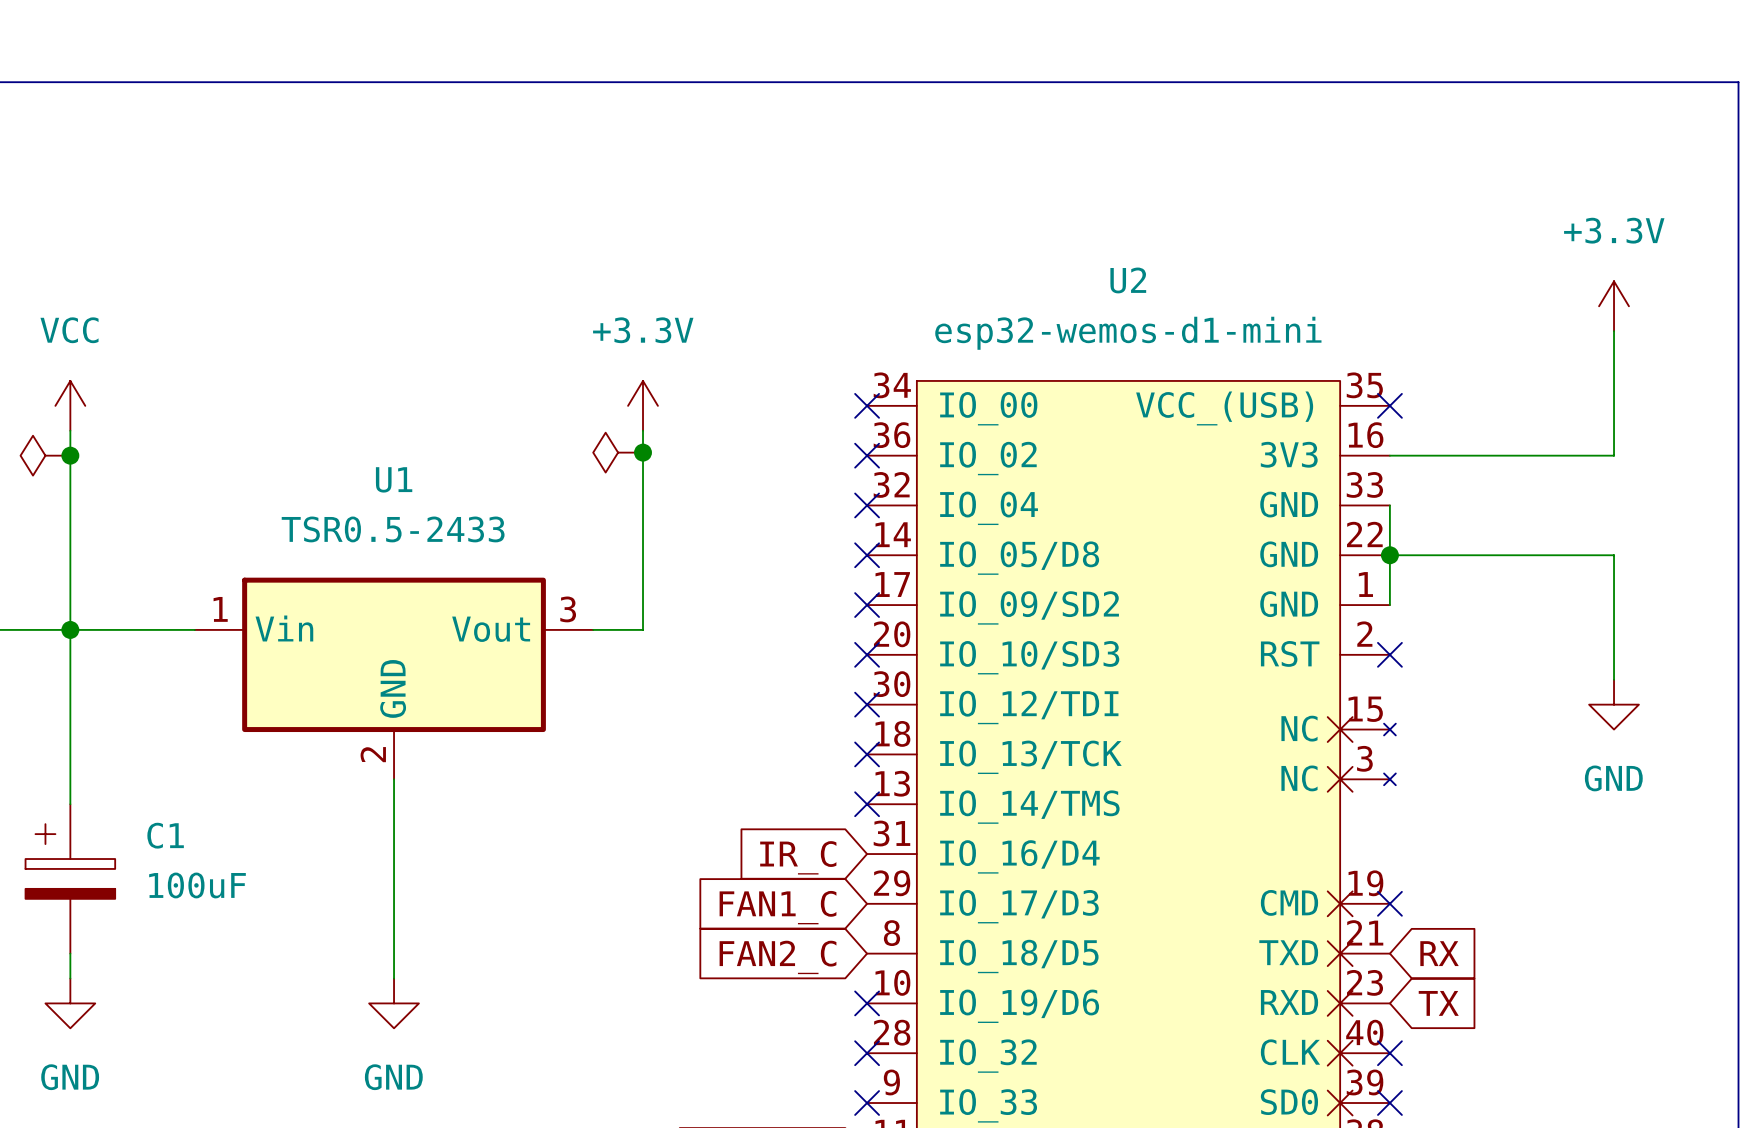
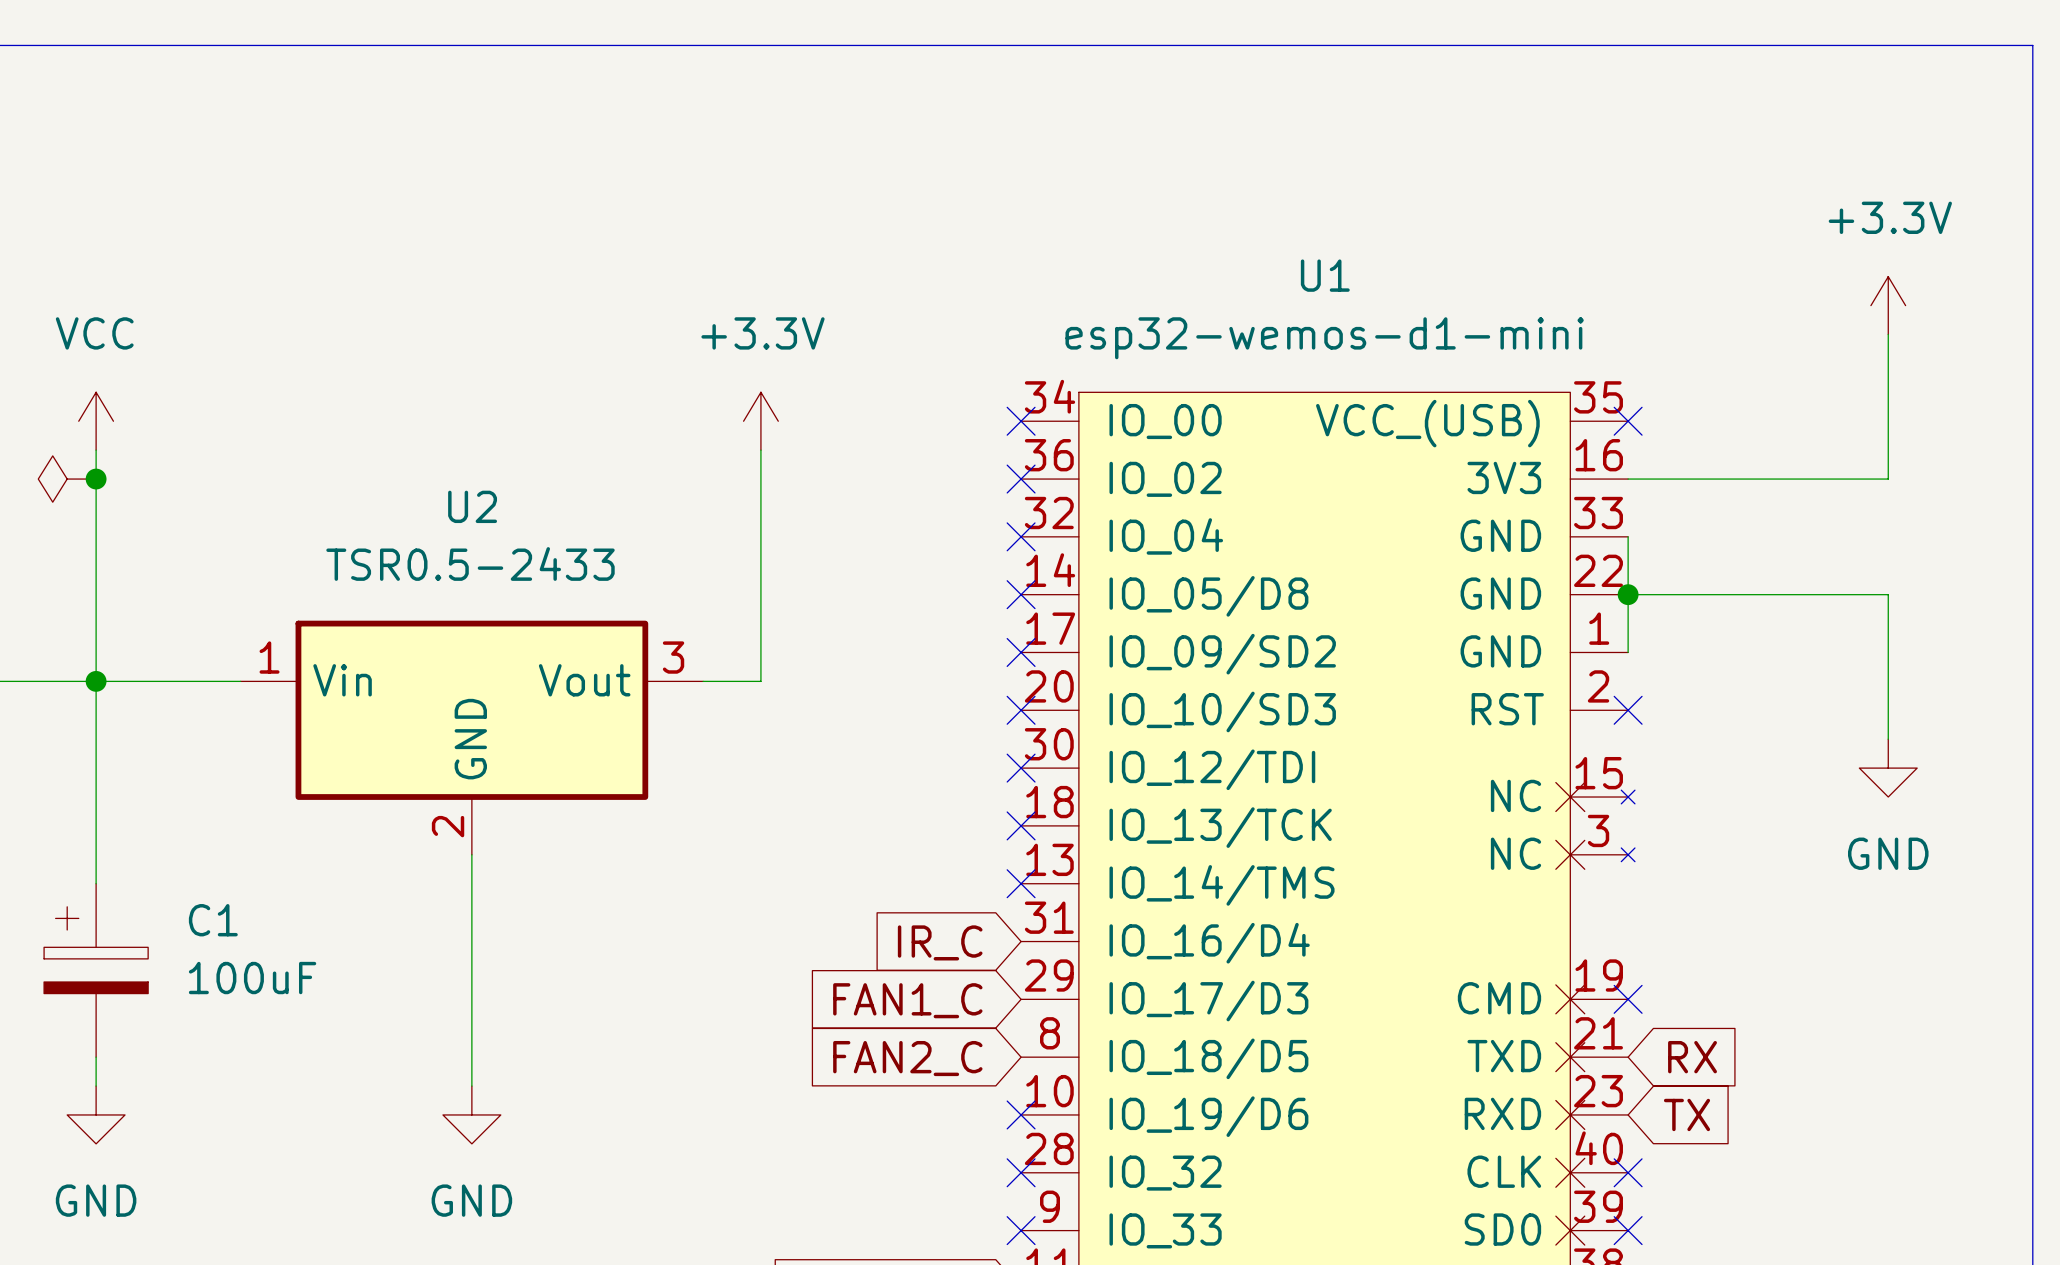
U2 name: U2 (1128, 280) -> U1 (1325, 275)
power symbol: (618, 452) -> none
junction: (643, 452) -> none
U1 name: U1 (394, 479) -> U2 (472, 506)

